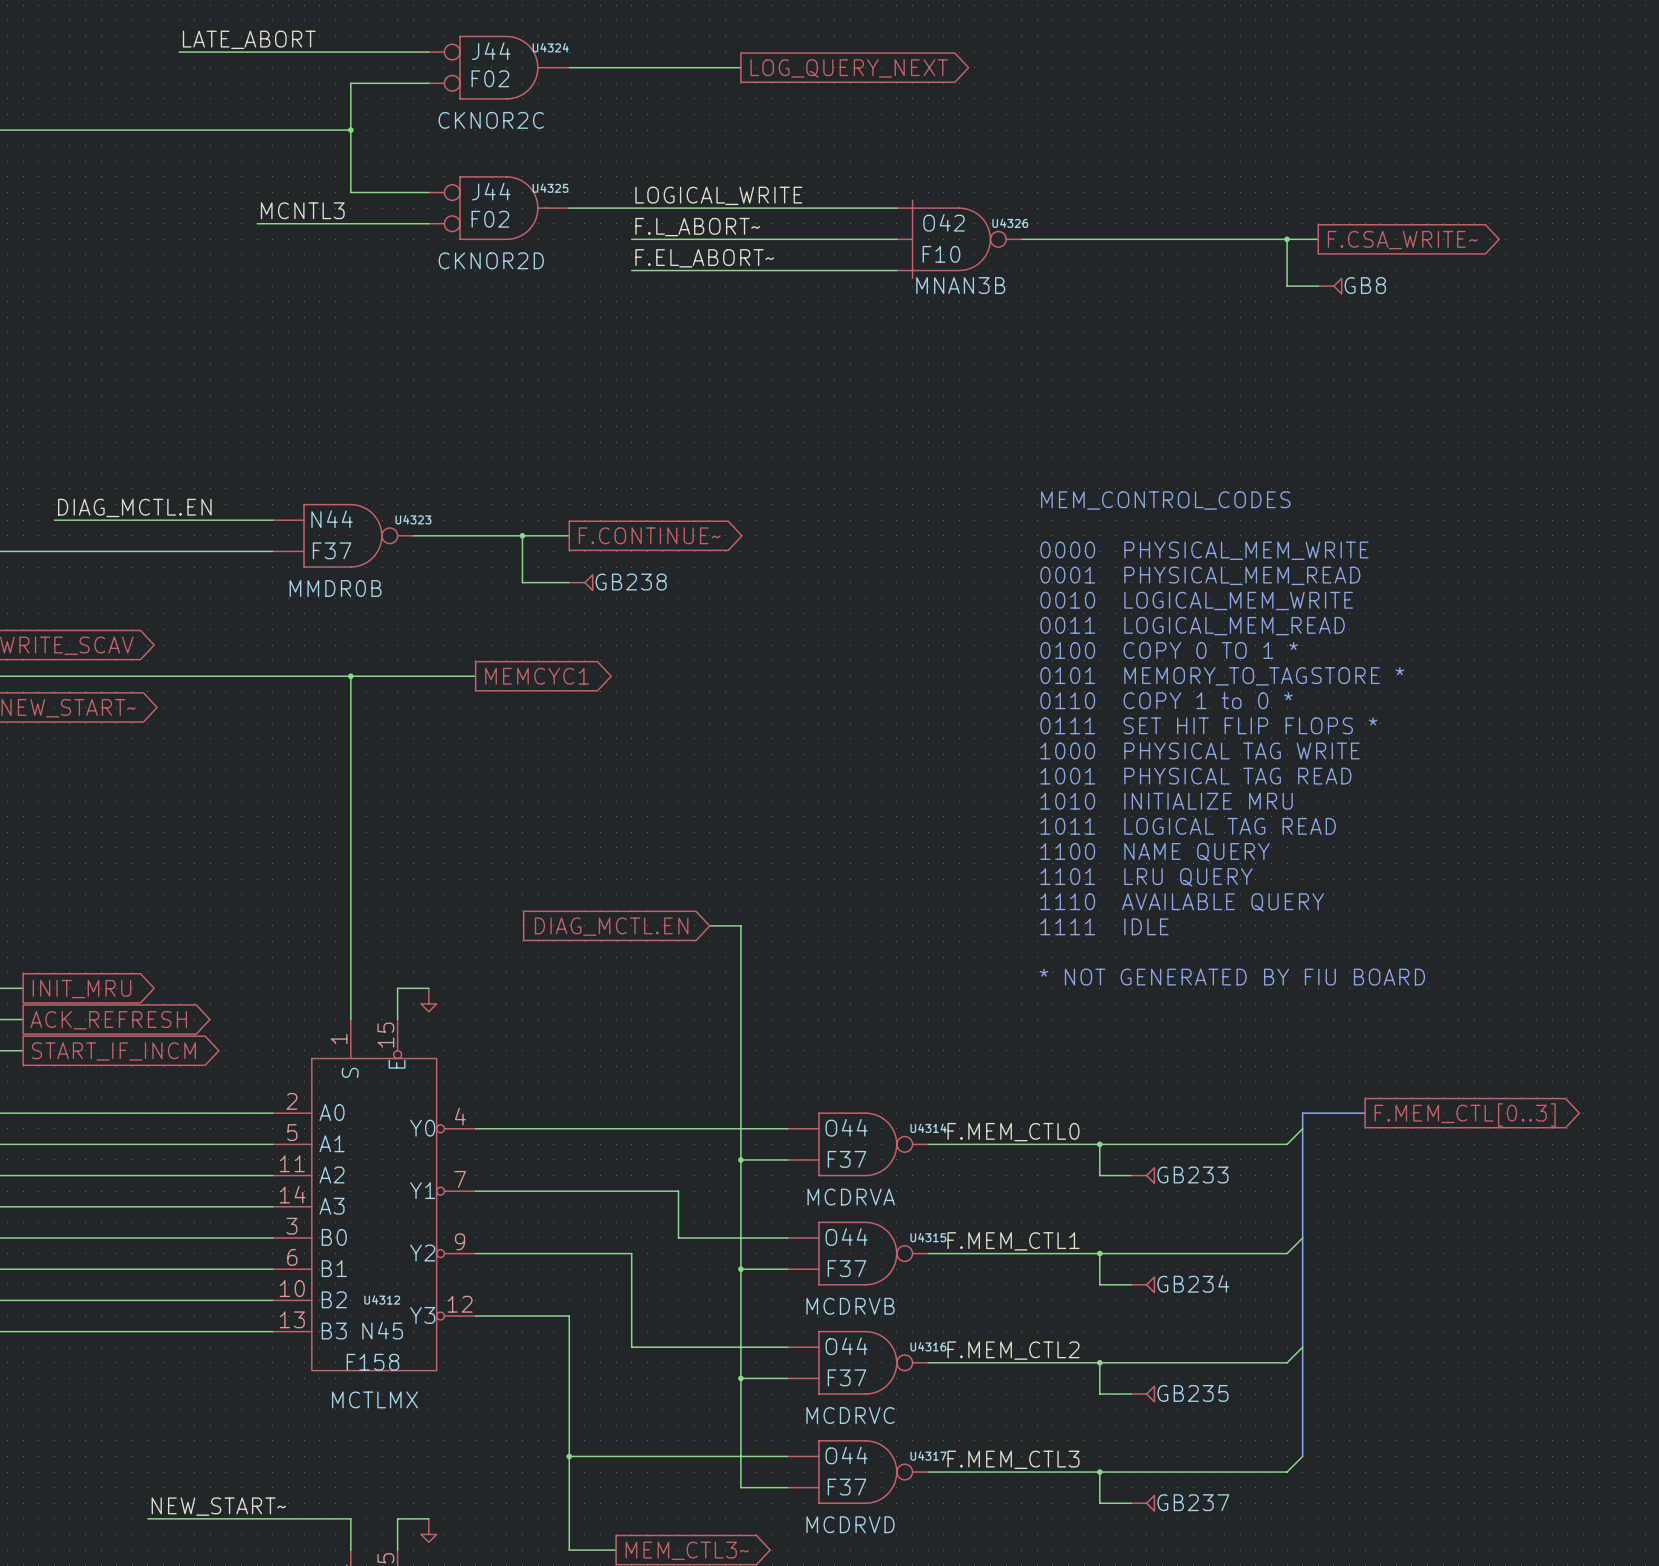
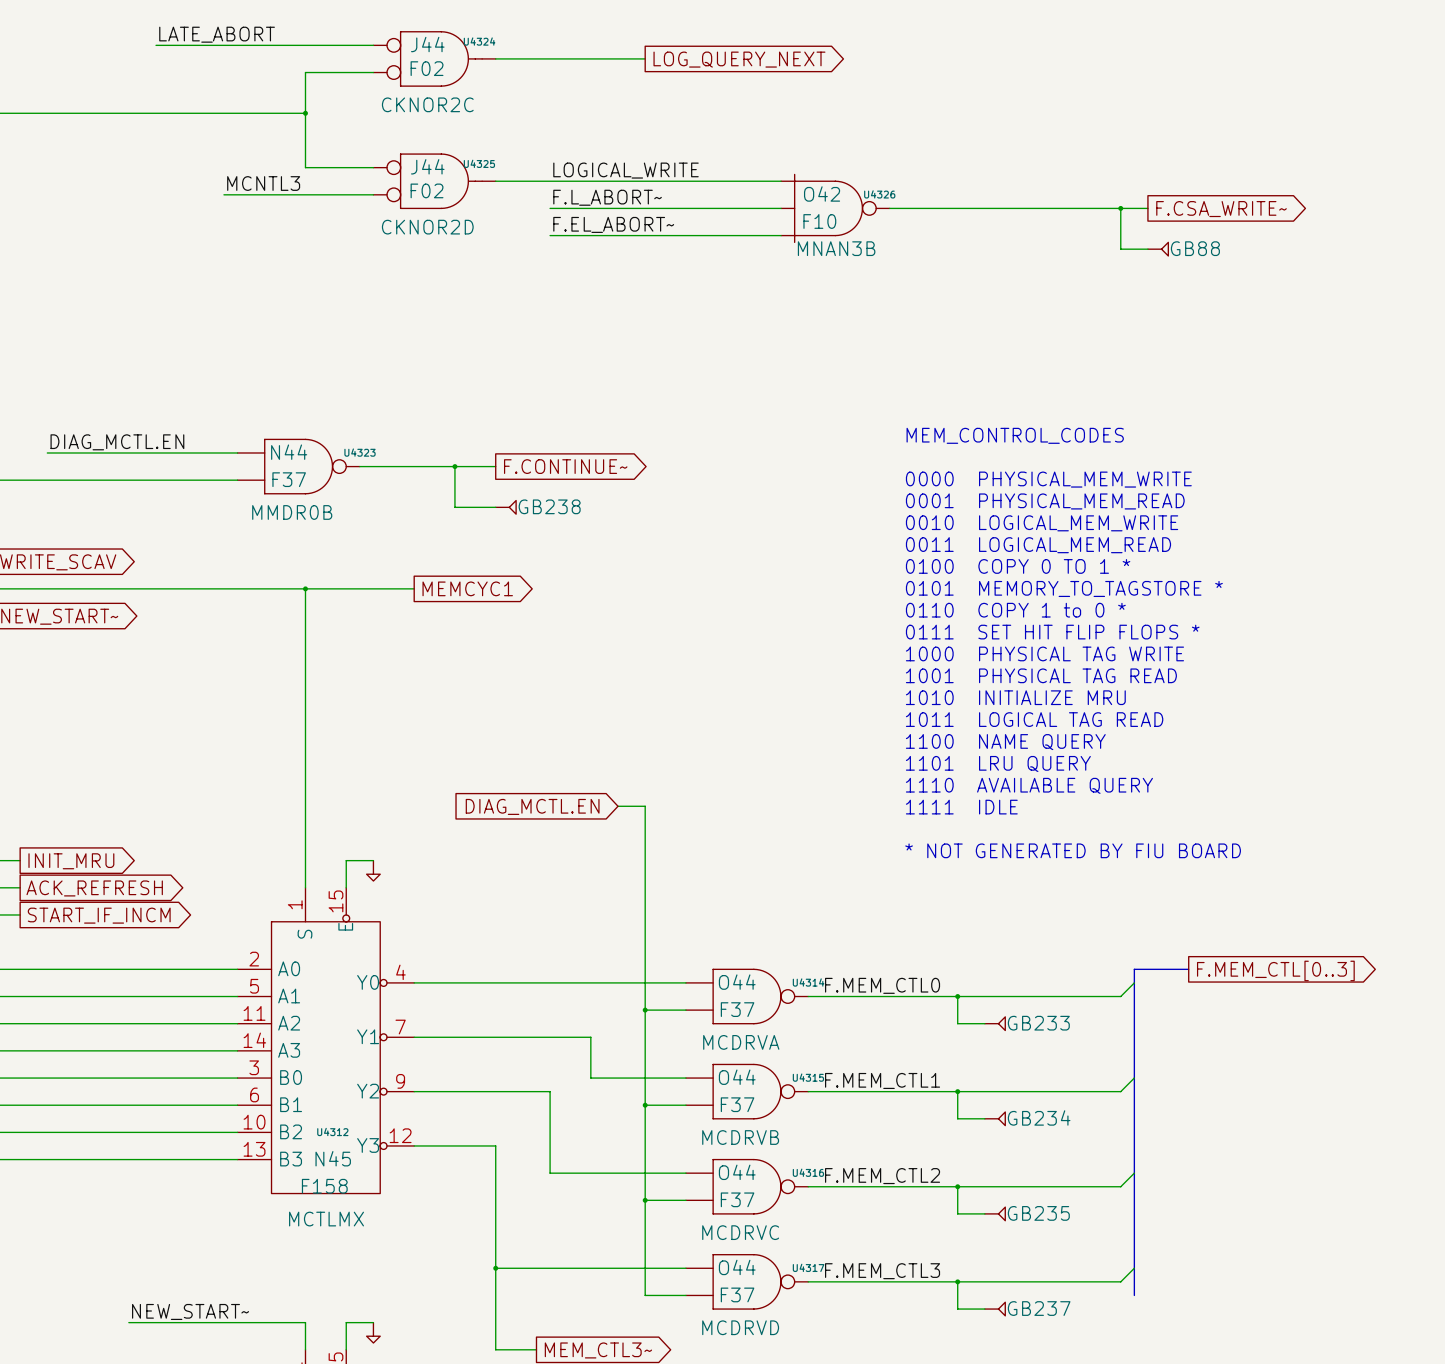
GB8 name: GB8 (1365, 285) -> GB88 (1195, 248)
bus: none -> (1134, 1268) (1134, 1295)

